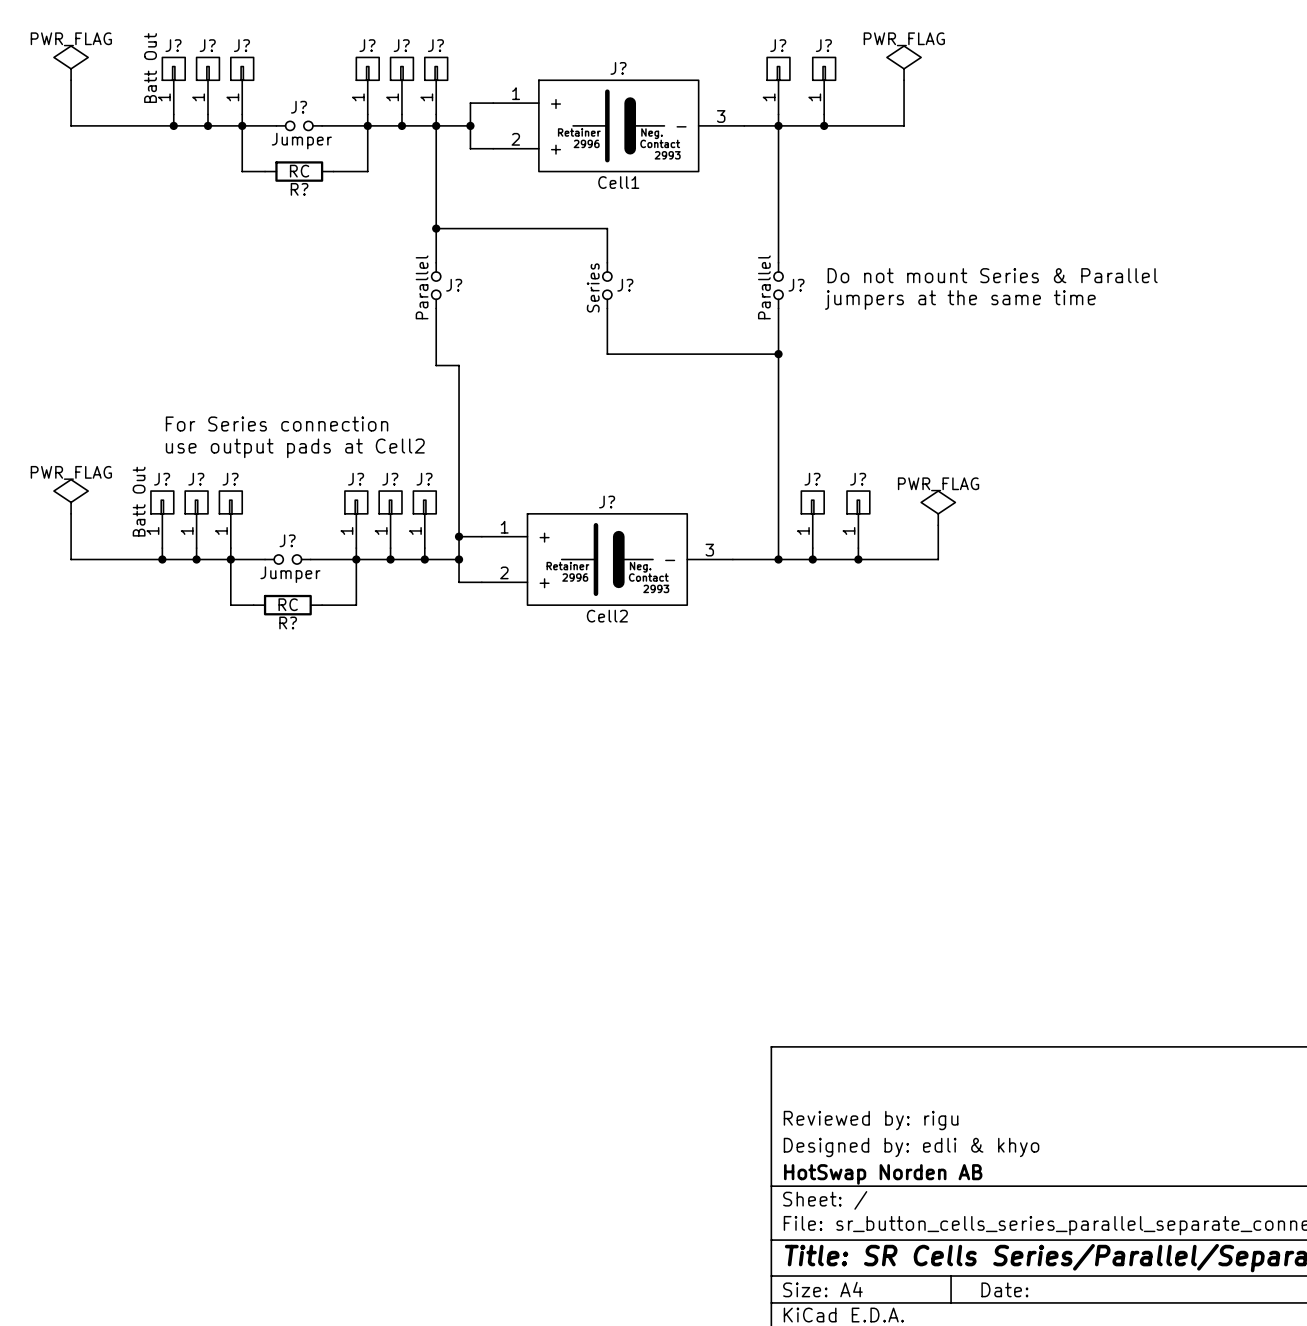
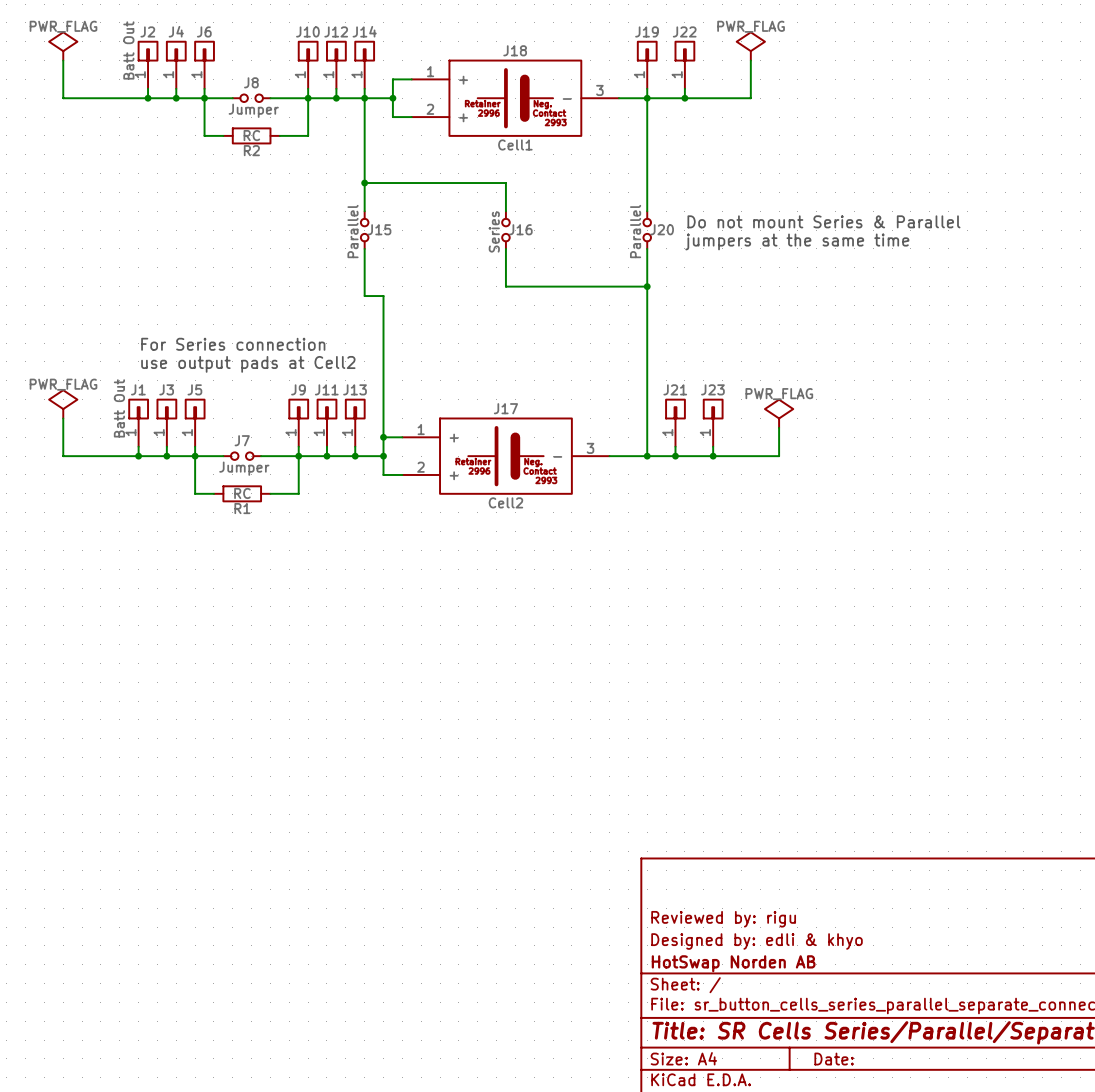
J? name: J? (173, 45) -> J2 (147, 31)
J? name: J? (207, 45) -> J4 (176, 31)
J? name: J? (241, 45) -> J6 (204, 31)
J? name: J? (367, 45) -> J10 (307, 31)
J? name: J? (401, 45) -> J12 (336, 31)
J? name: J? (435, 45) -> J14 (364, 31)
J? name: J? (778, 45) -> J19 (647, 31)
J? name: J? (823, 45) -> J22 (684, 31)
J? name: J? (618, 68) -> J18 (515, 50)
J? name: J? (299, 107) -> J8 (251, 82)
R? name: R? (299, 189) -> R2 (251, 150)
J? name: J? (454, 285) -> J15 (379, 229)
J? name: J? (625, 285) -> J16 (520, 229)
J? name: J? (796, 285) -> J20 (662, 229)
J? name: J? (162, 479) -> J1 (138, 389)
J? name: J? (196, 479) -> J3 (166, 389)
J? name: J? (230, 479) -> J5 (194, 389)
J? name: J? (356, 479) -> J9 (298, 389)
J? name: J? (390, 479) -> J11 (326, 389)
J? name: J? (424, 479) -> J13 (355, 389)
J? name: J? (812, 479) -> J21 (675, 389)
J? name: J? (858, 479) -> J23 (712, 389)
J? name: J? (607, 502) -> J17 (505, 408)
J? name: J? (287, 540) -> J7 (242, 440)
R? name: R? (288, 622) -> R1 (242, 508)

